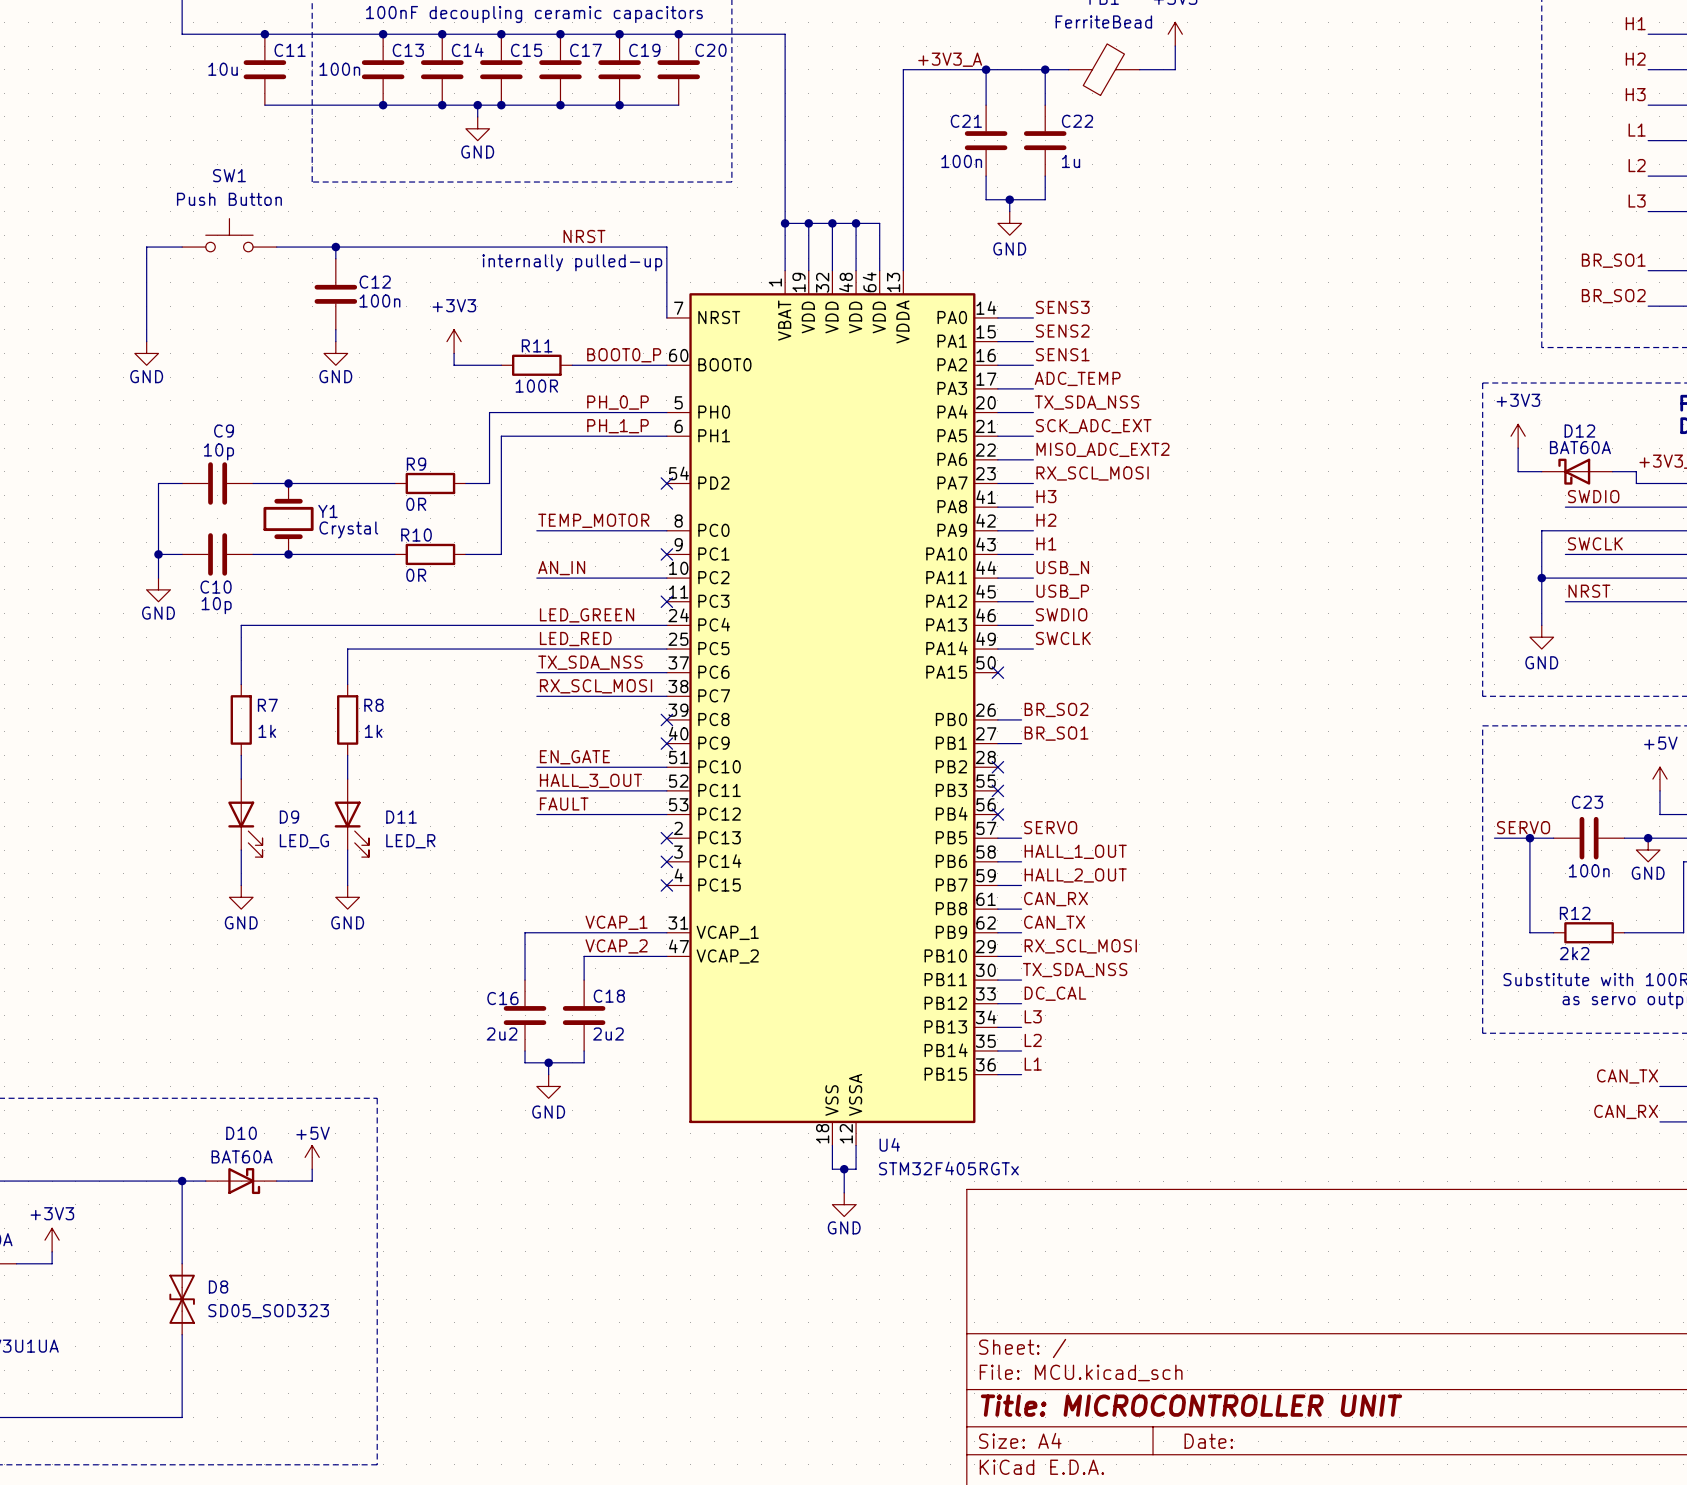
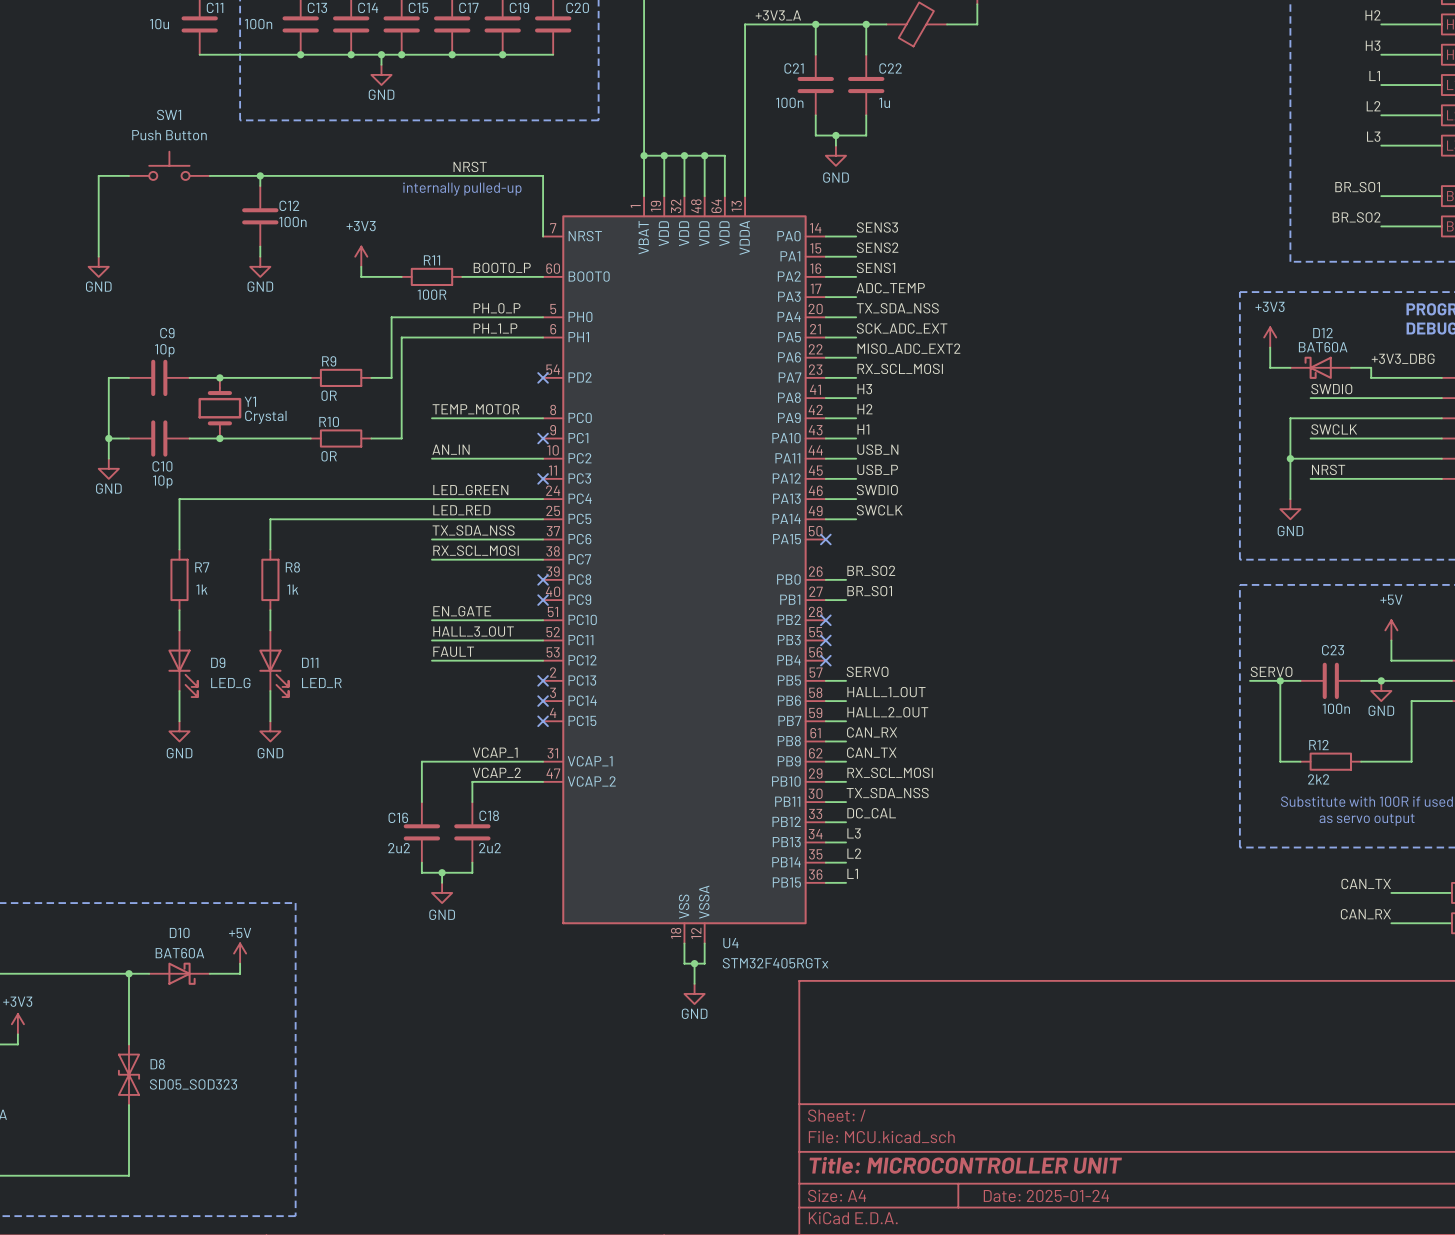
title block: Date: (1208, 1441) -> Date: 2025-01-24 (1046, 1195)

